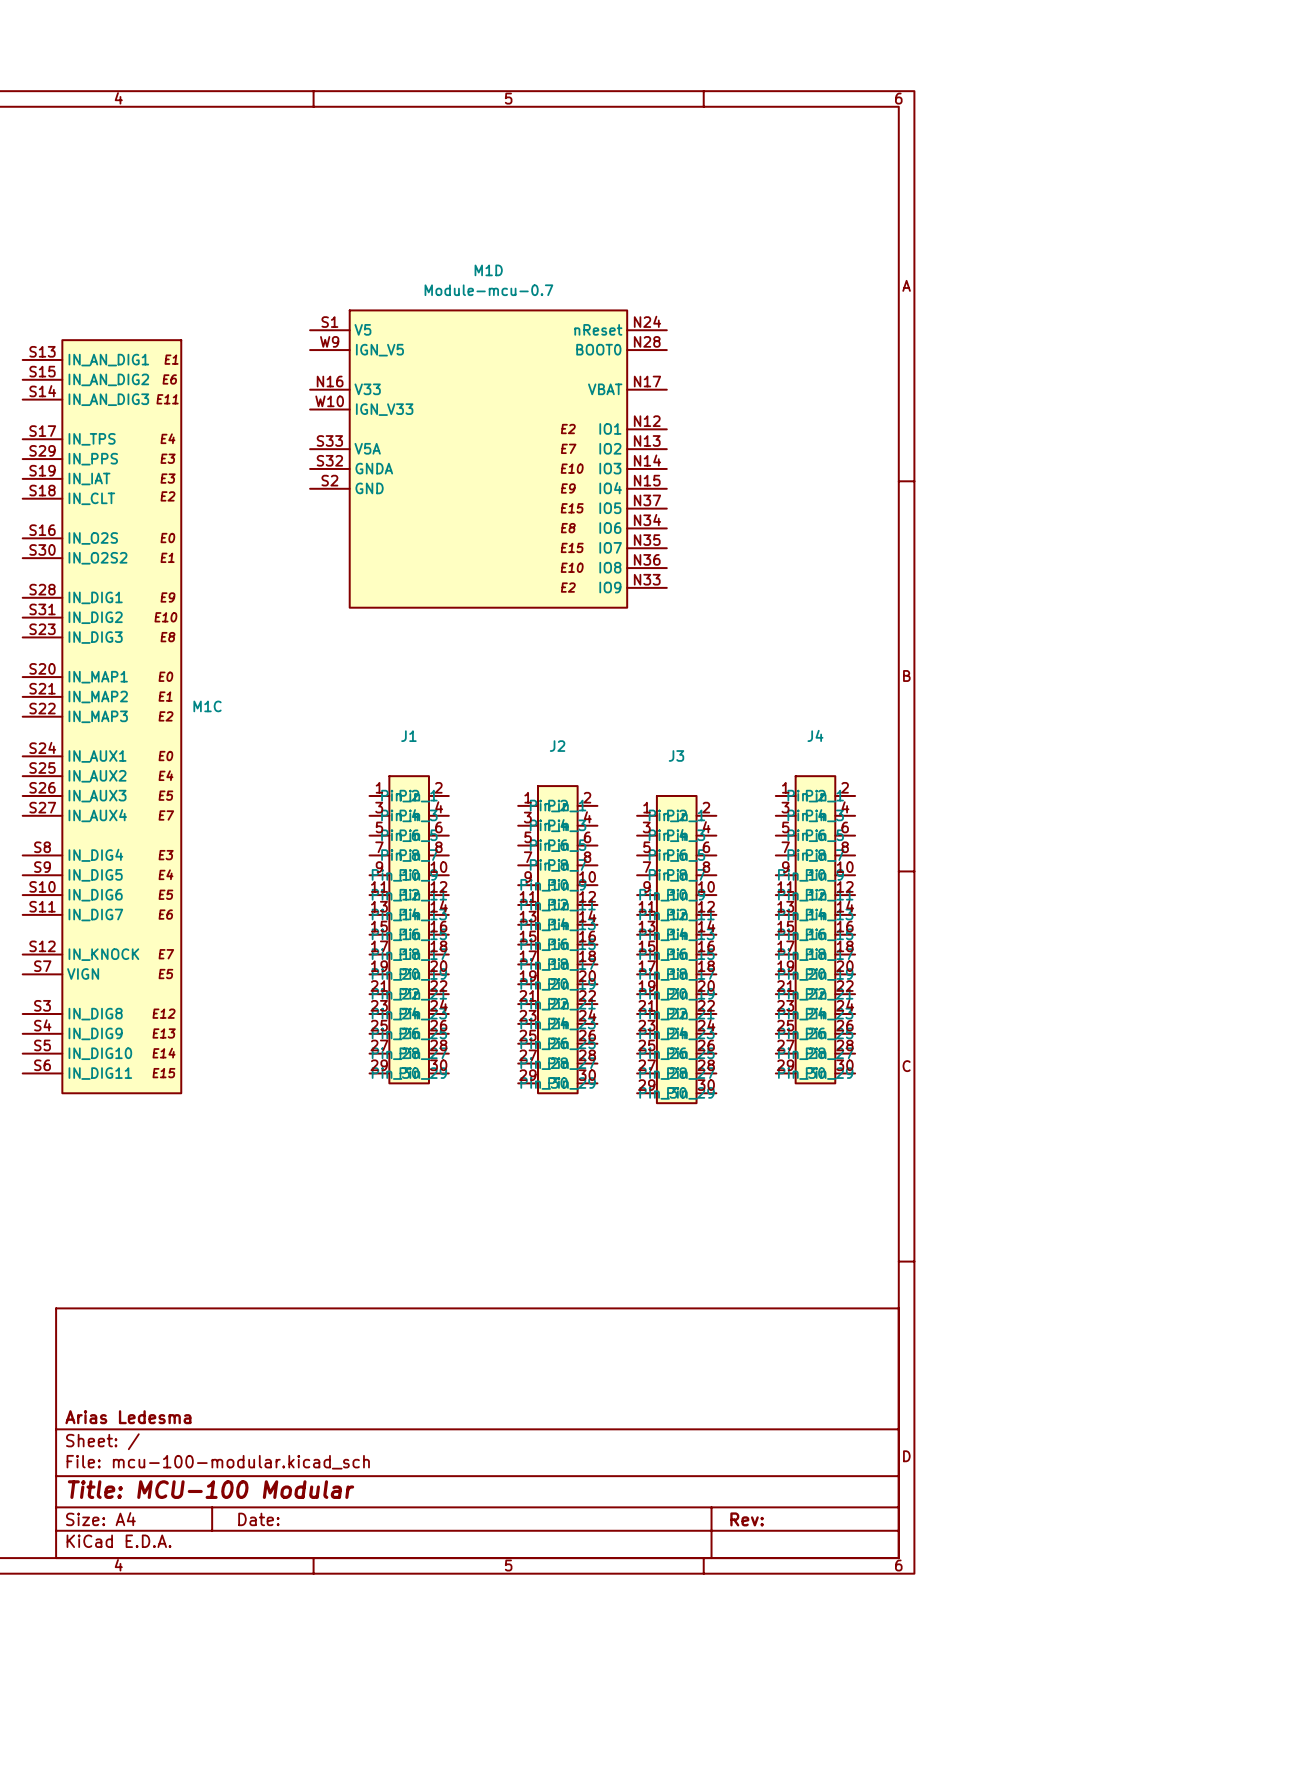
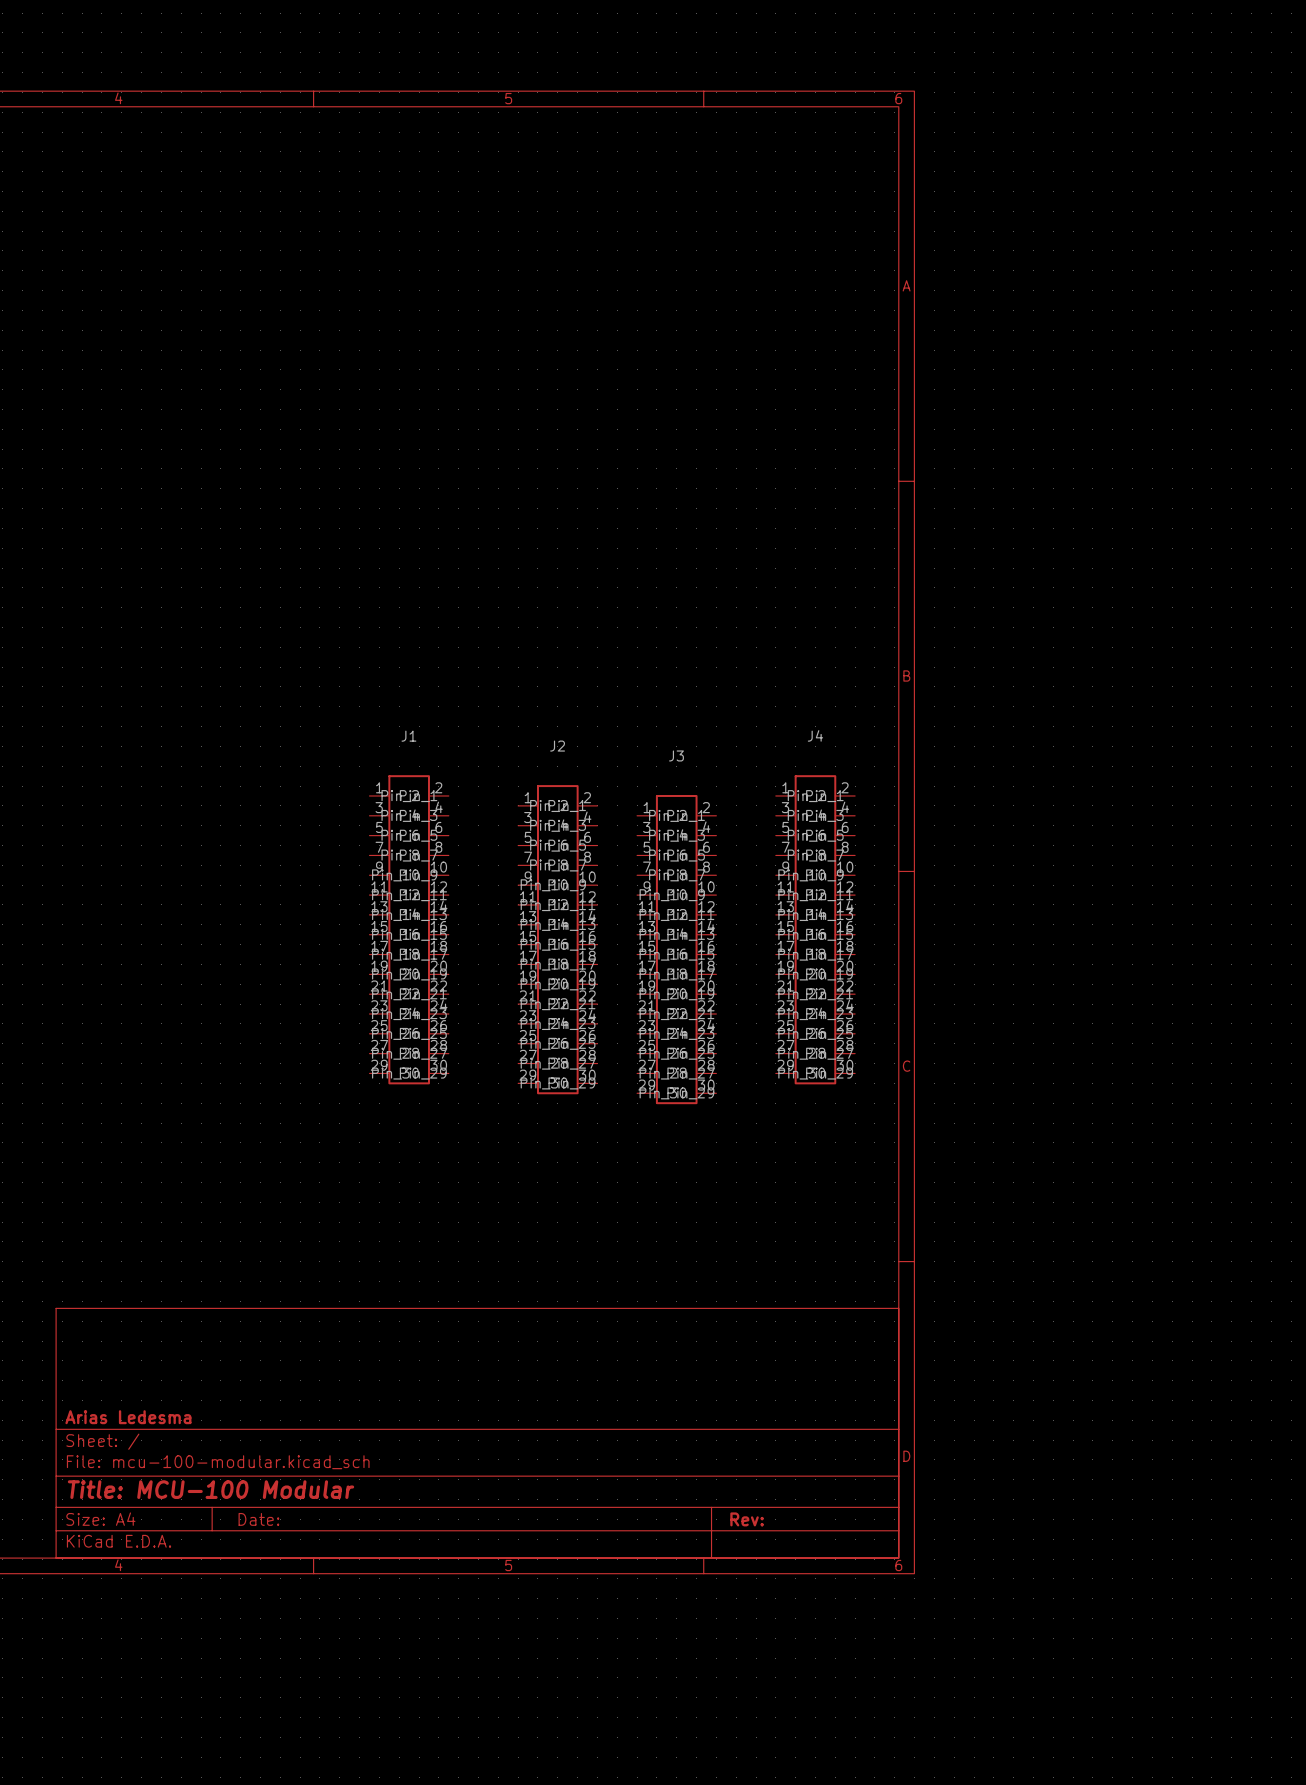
M1D: Module-mcu-0.7 (488, 459) -> none
M1C: (101, 716) -> none

